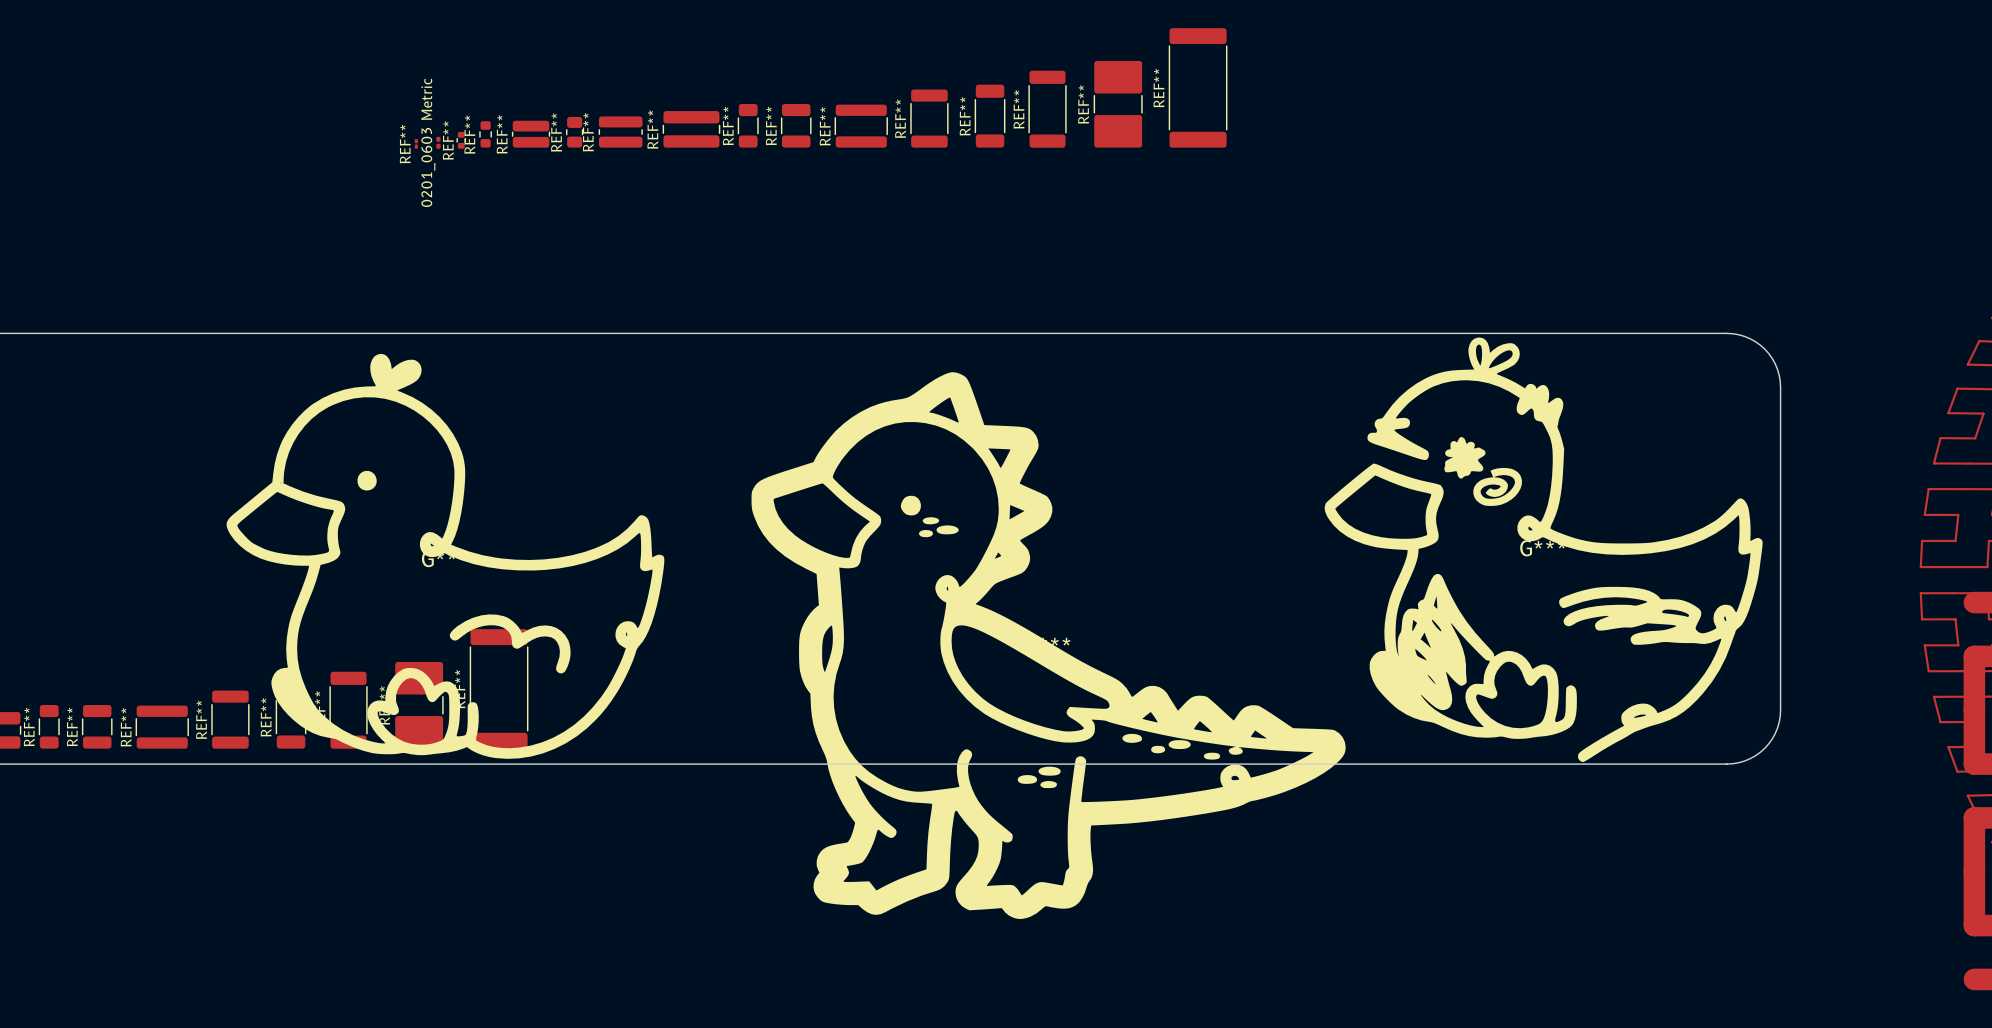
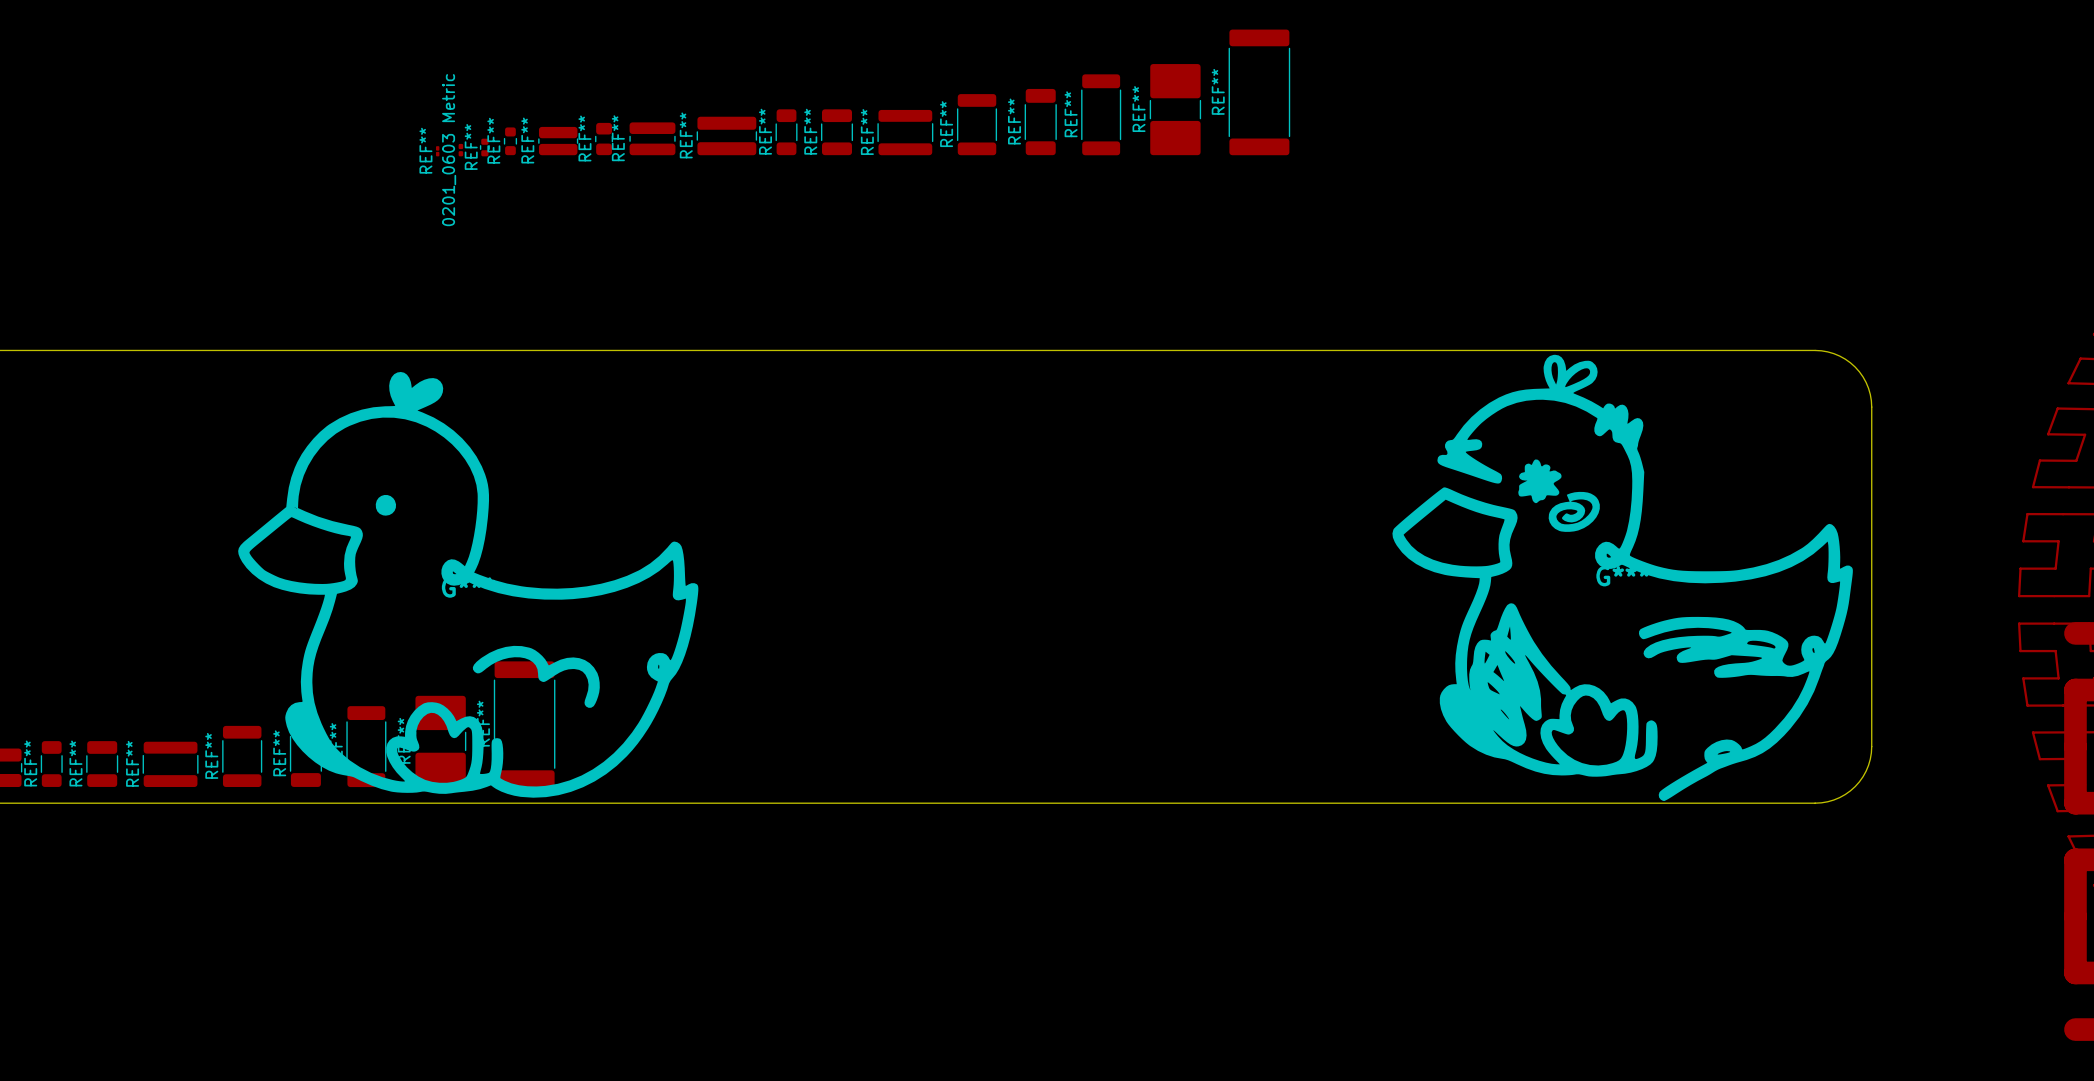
part: (1048, 645) -> none

